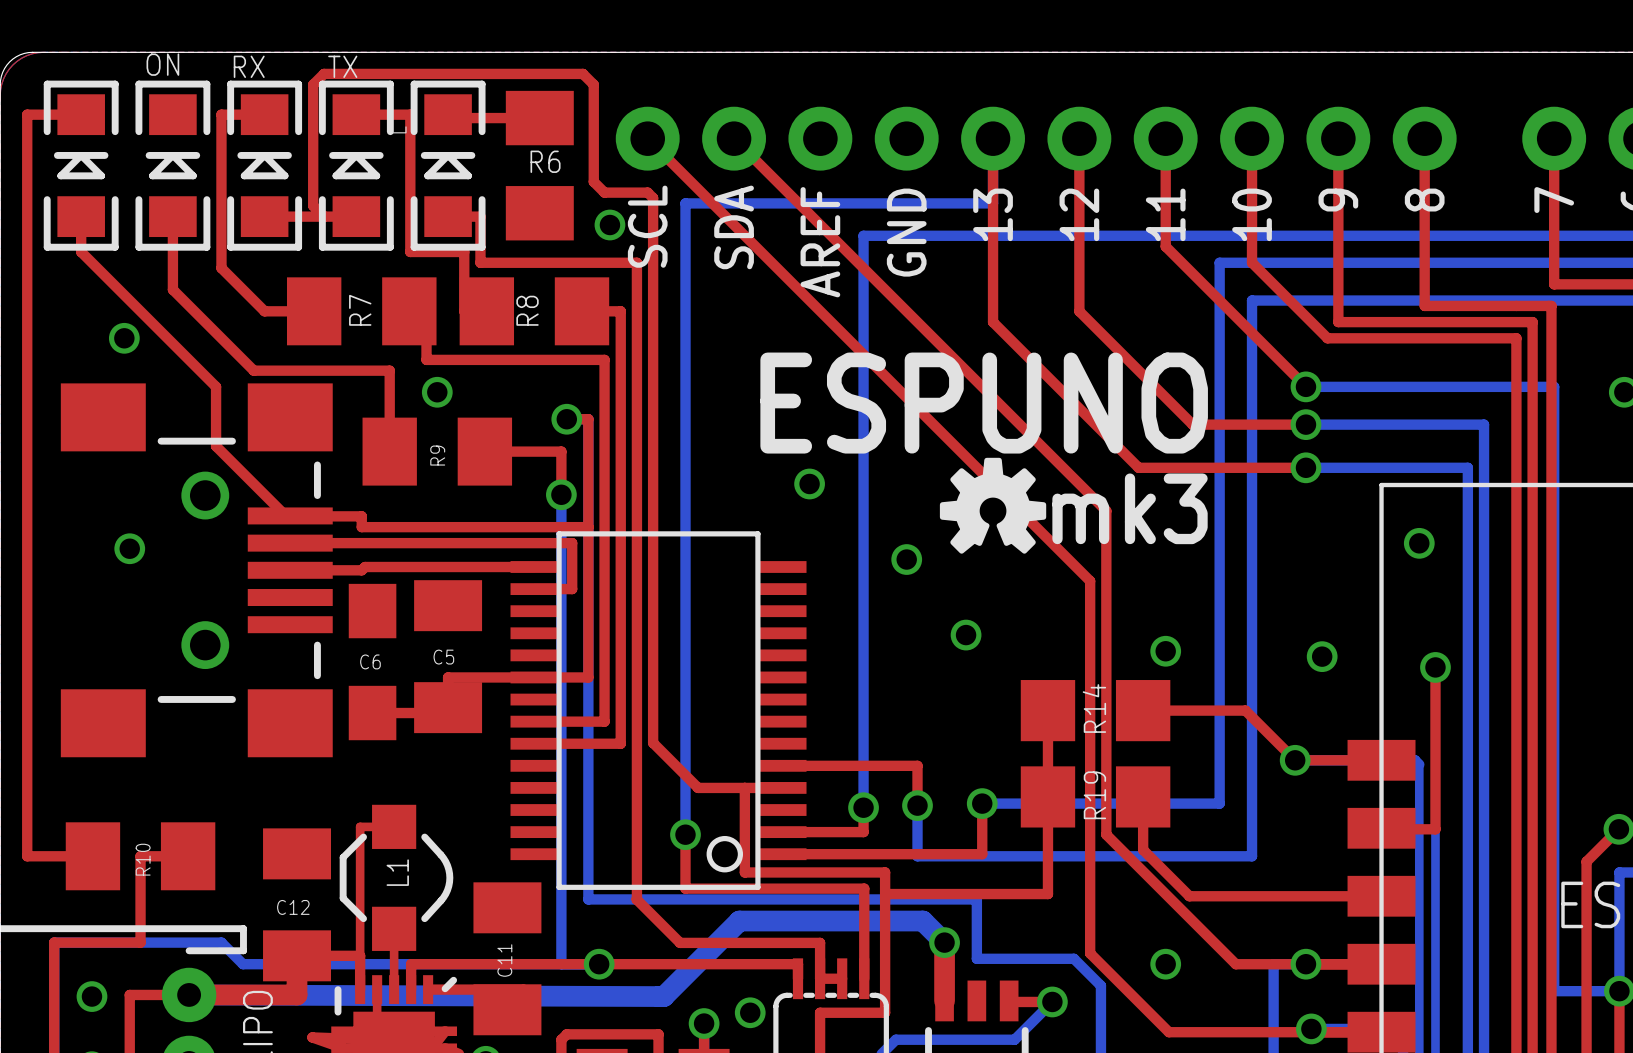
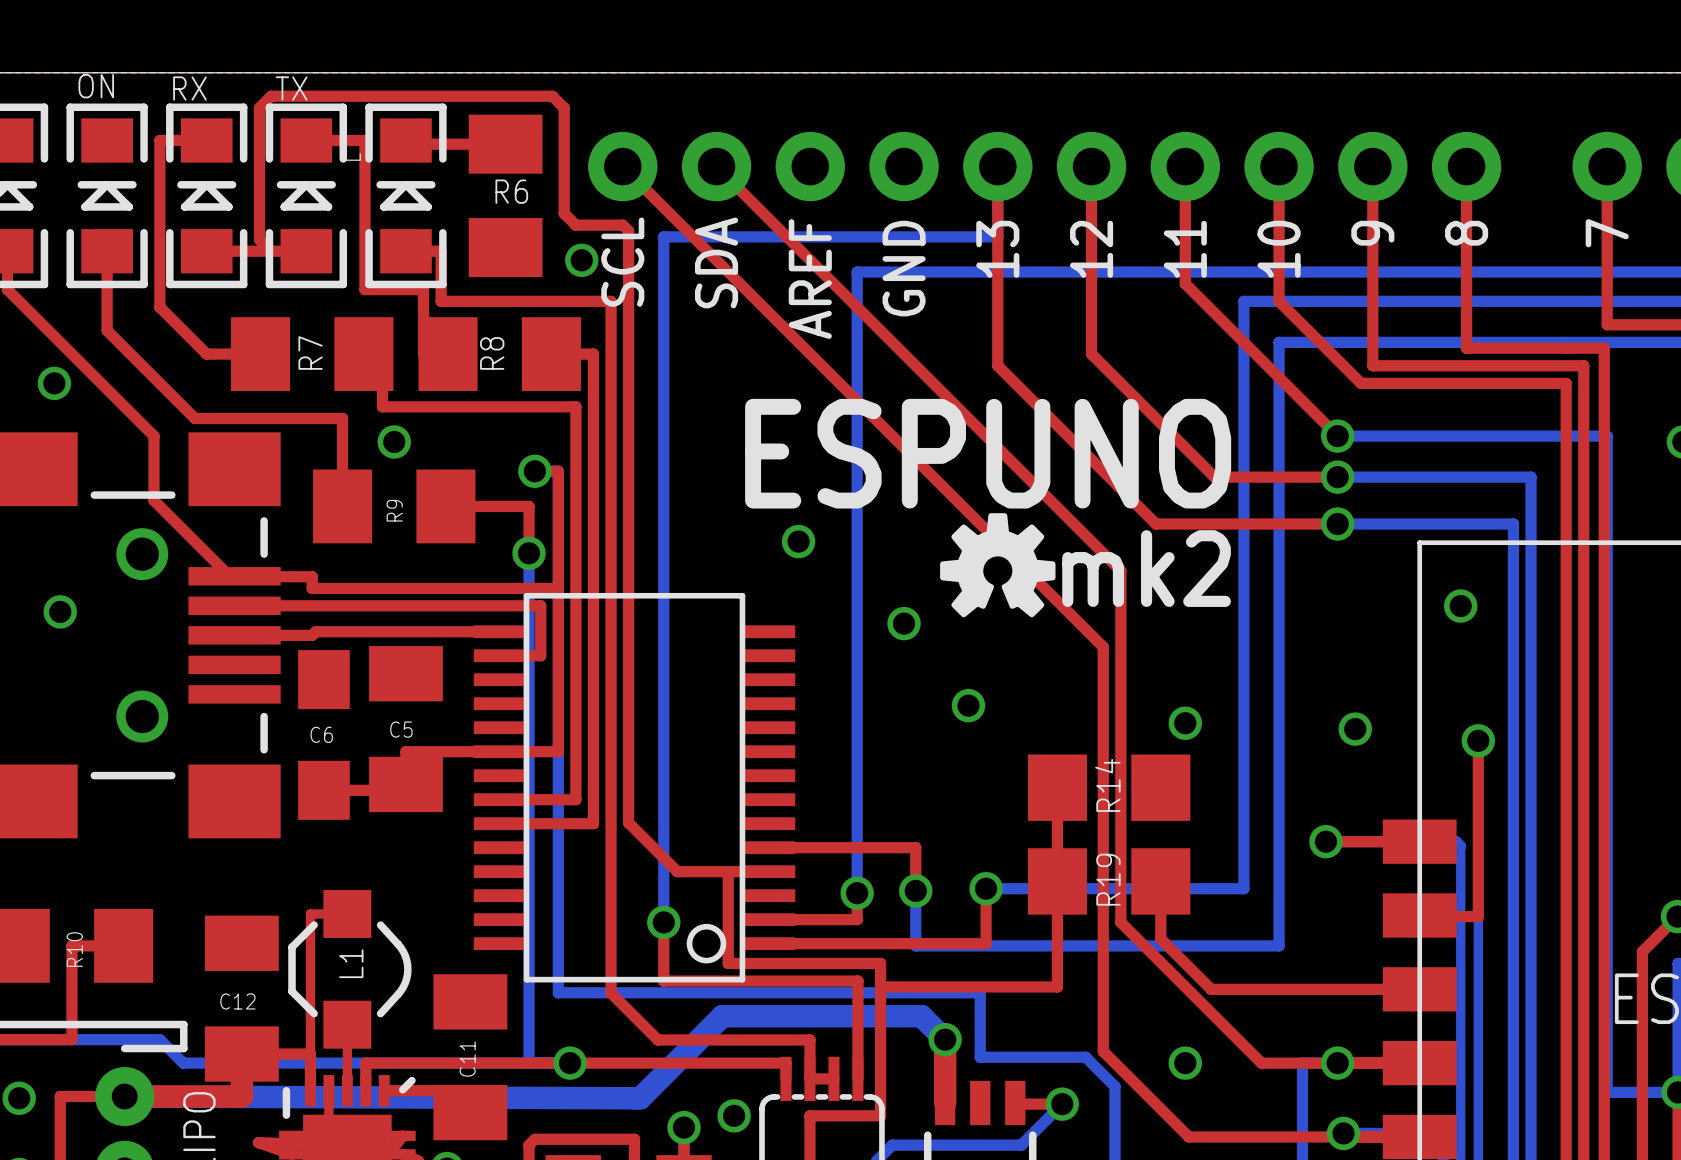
text: mk3 (1130, 508) -> mk2 (1146, 568)
top track: (1143, 710) (1245, 710) (1295, 760) -> none

